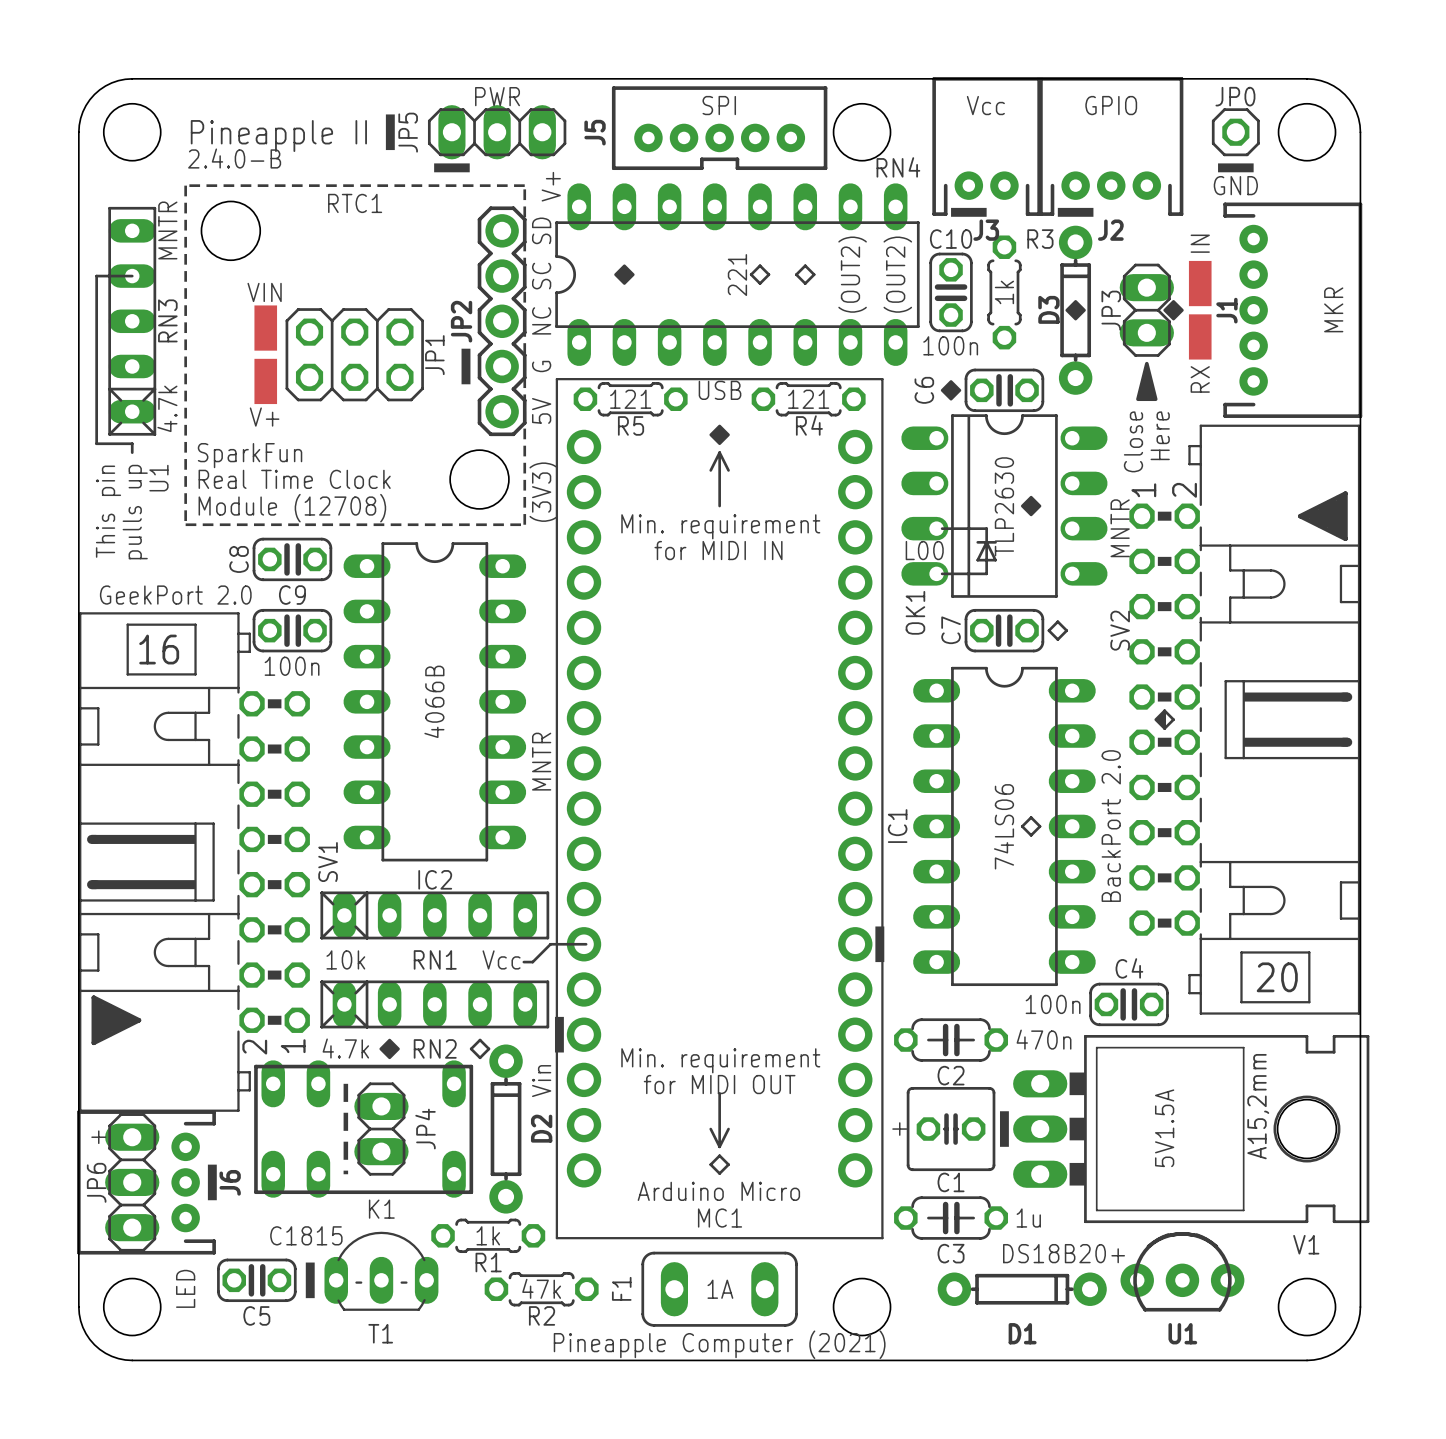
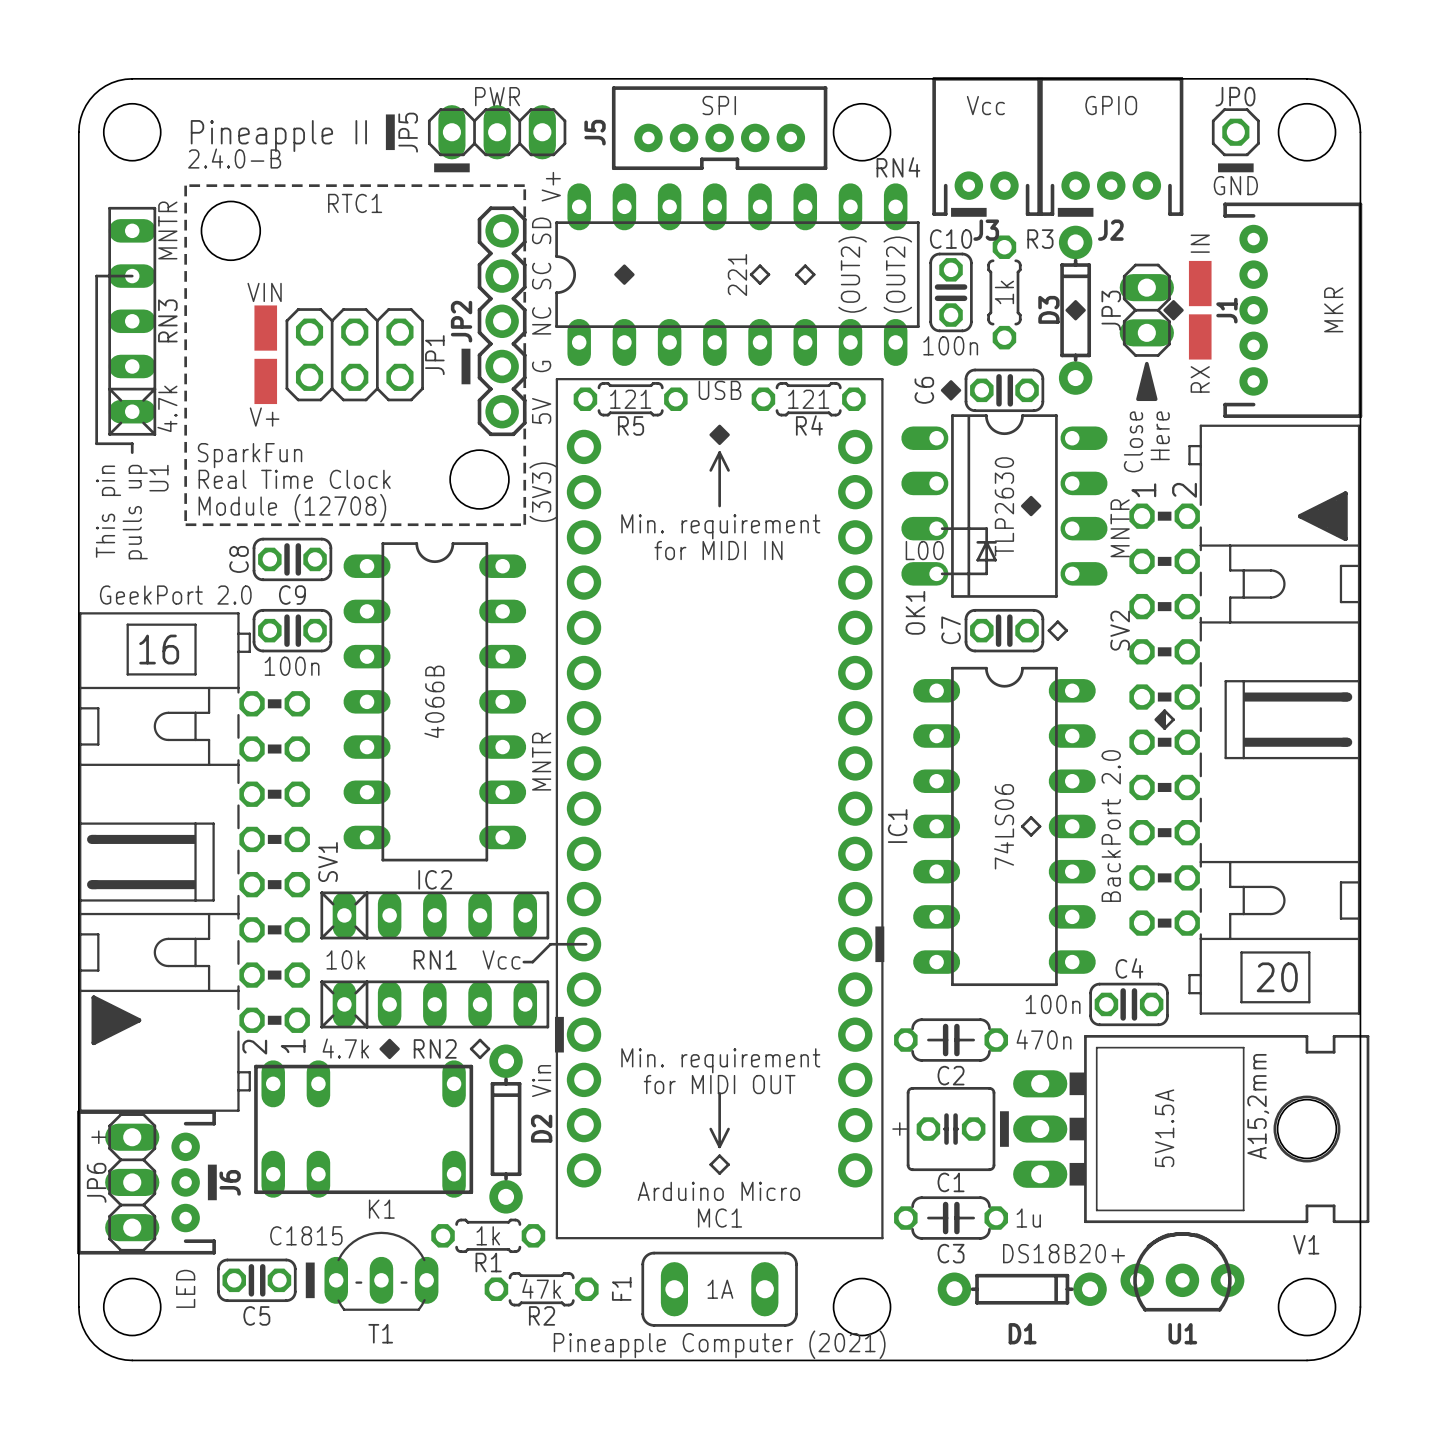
line: (345, 1083) (345, 1174) -> none
JP4: (381, 1129) -> none

